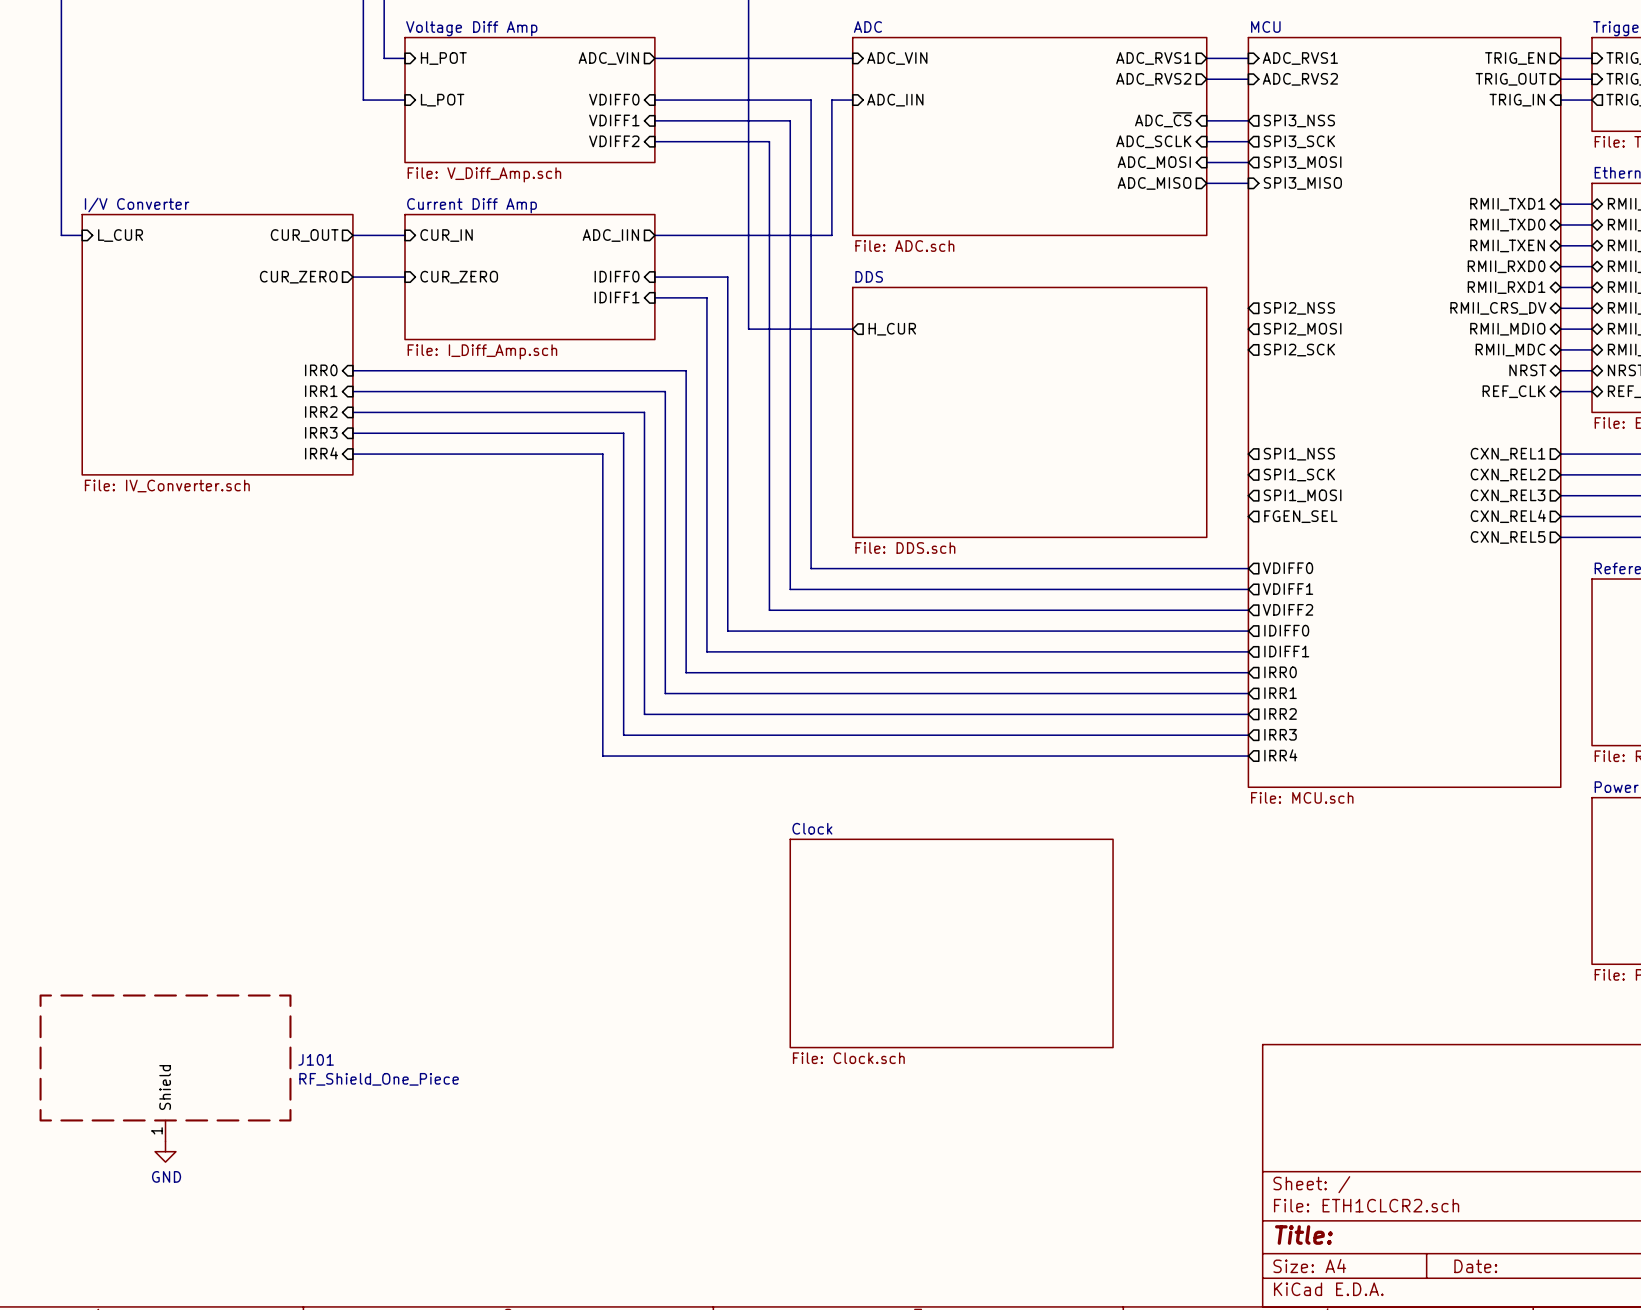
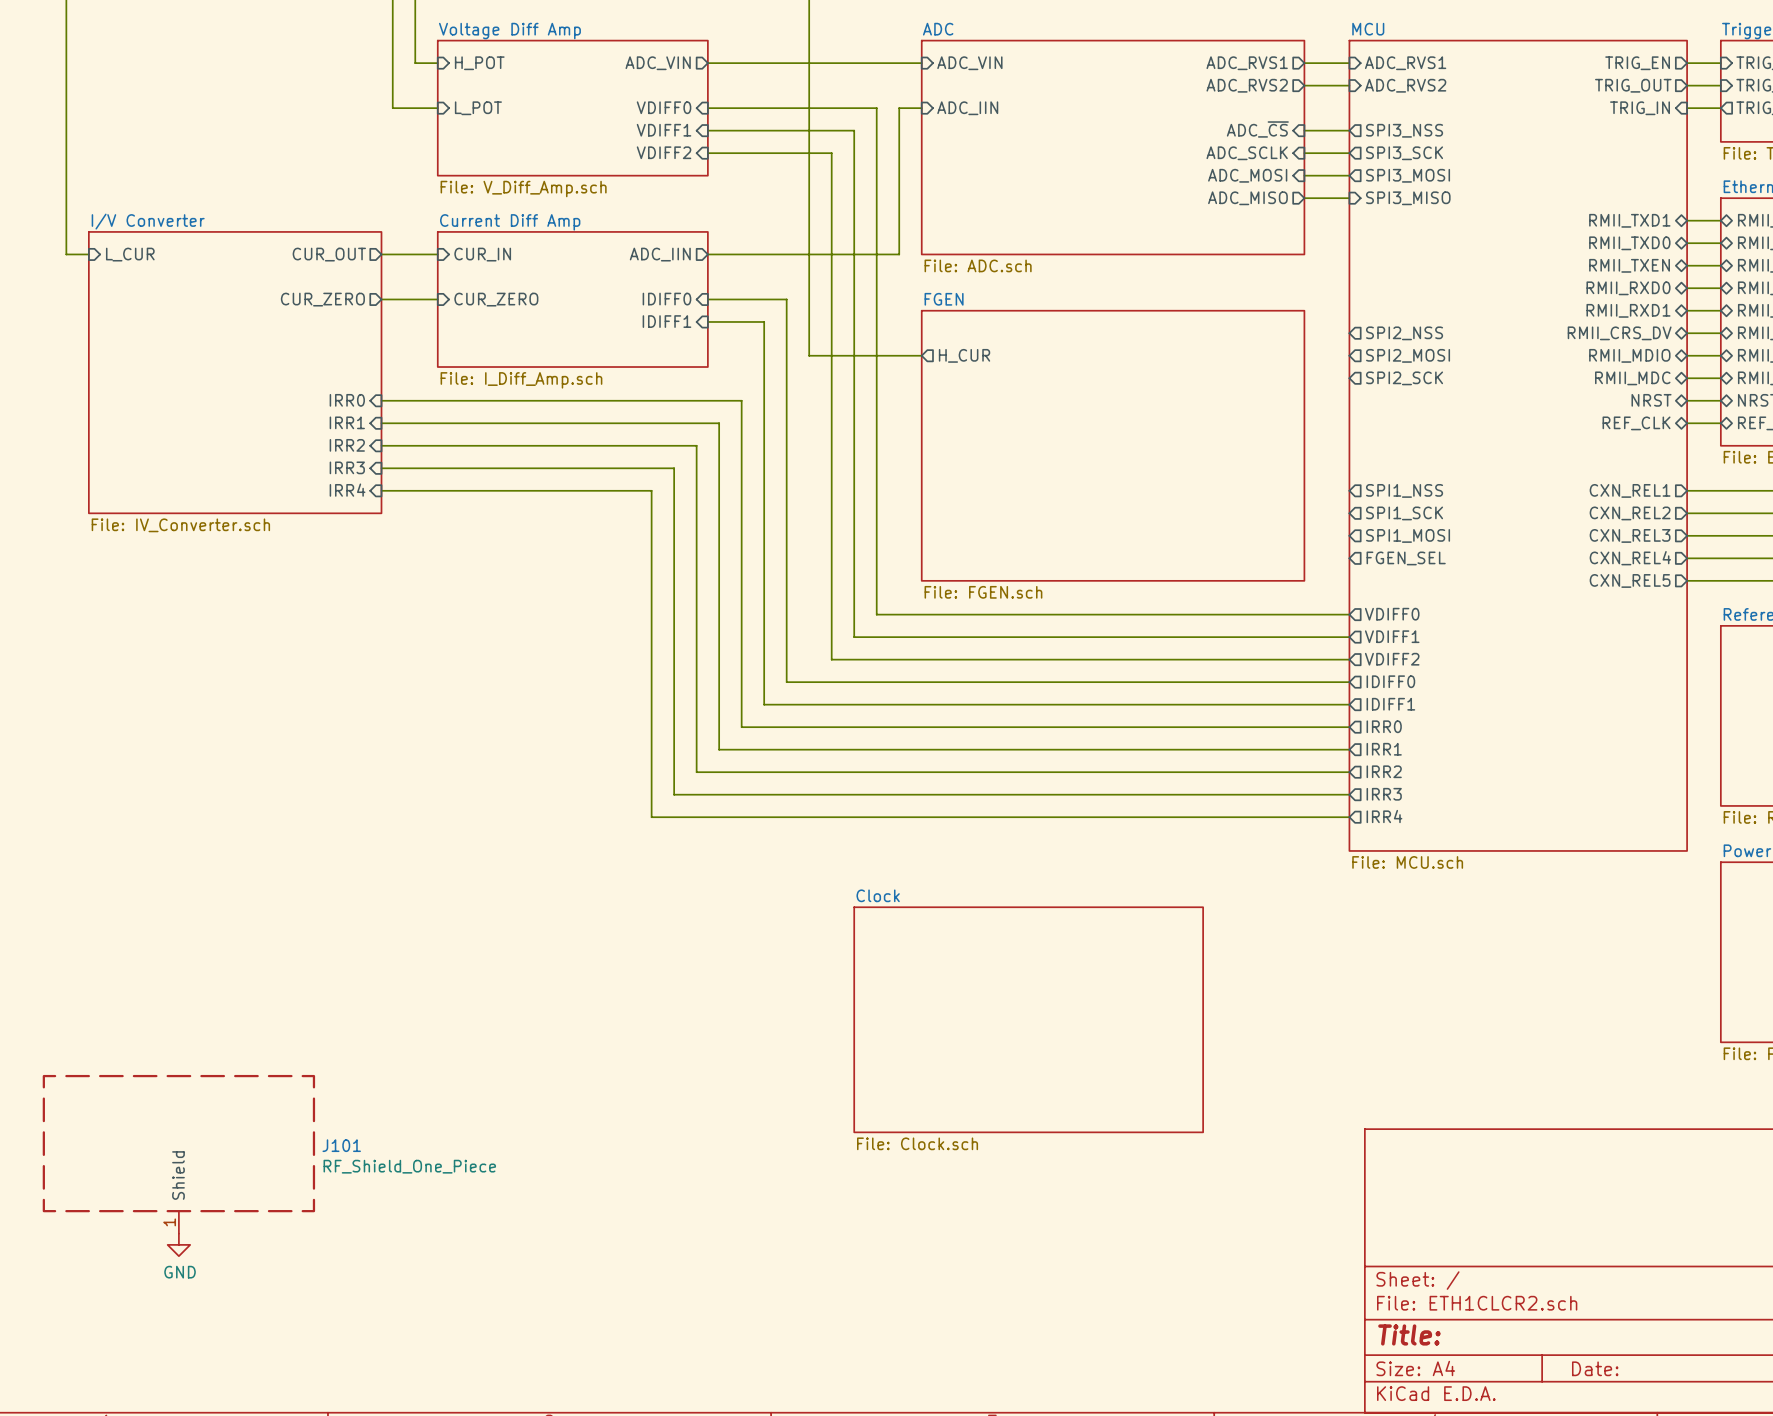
sheet DDS name: DDS (869, 276) -> FGEN (944, 299)
sheet DDS value: File: DDS.sch (905, 547) -> File: FGEN.sch (983, 592)

